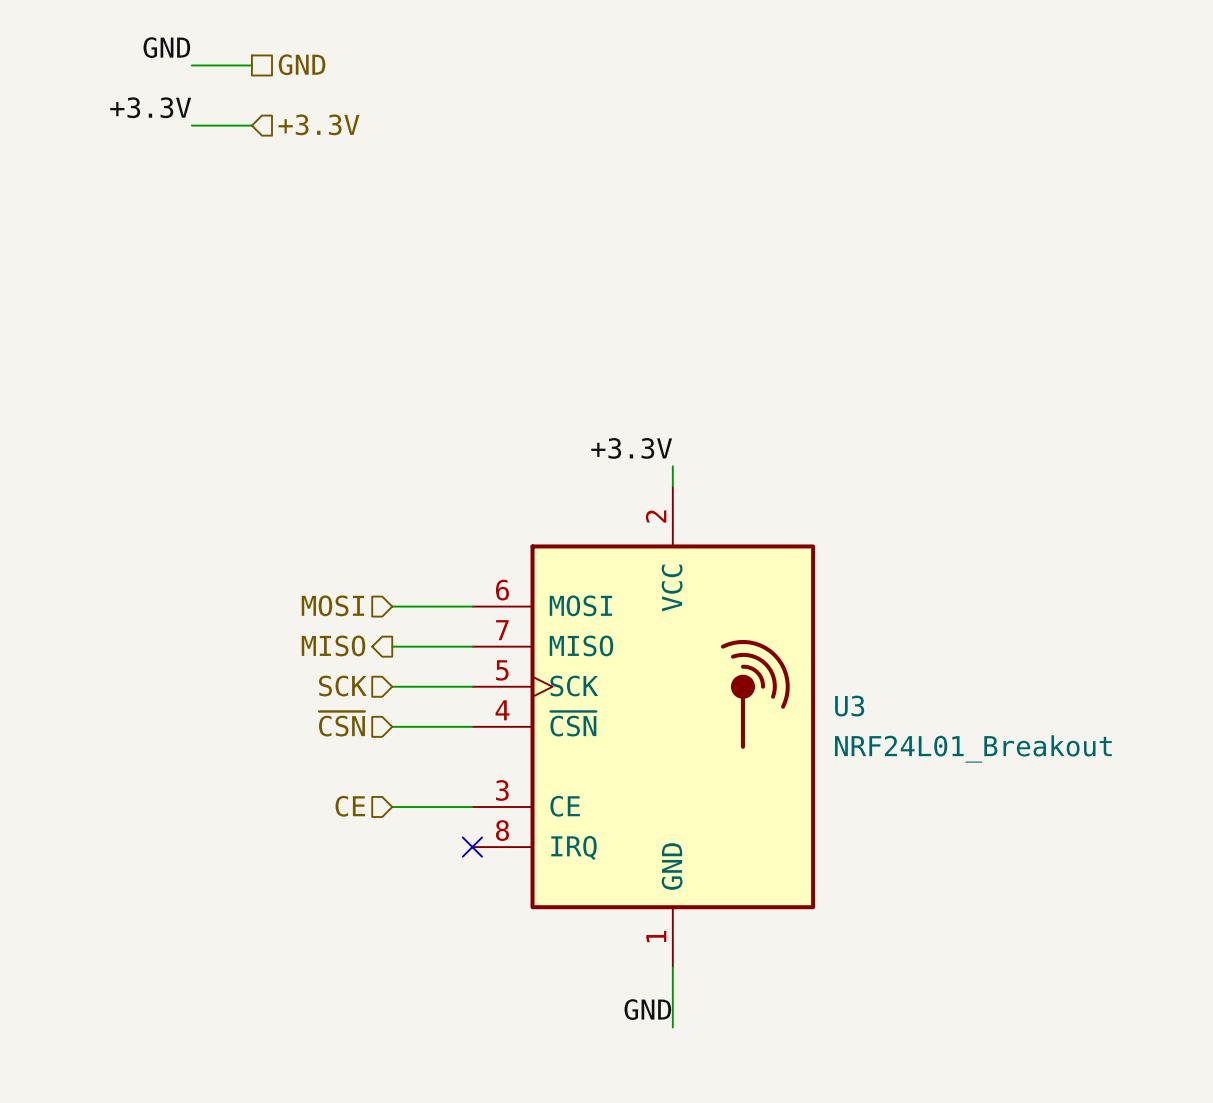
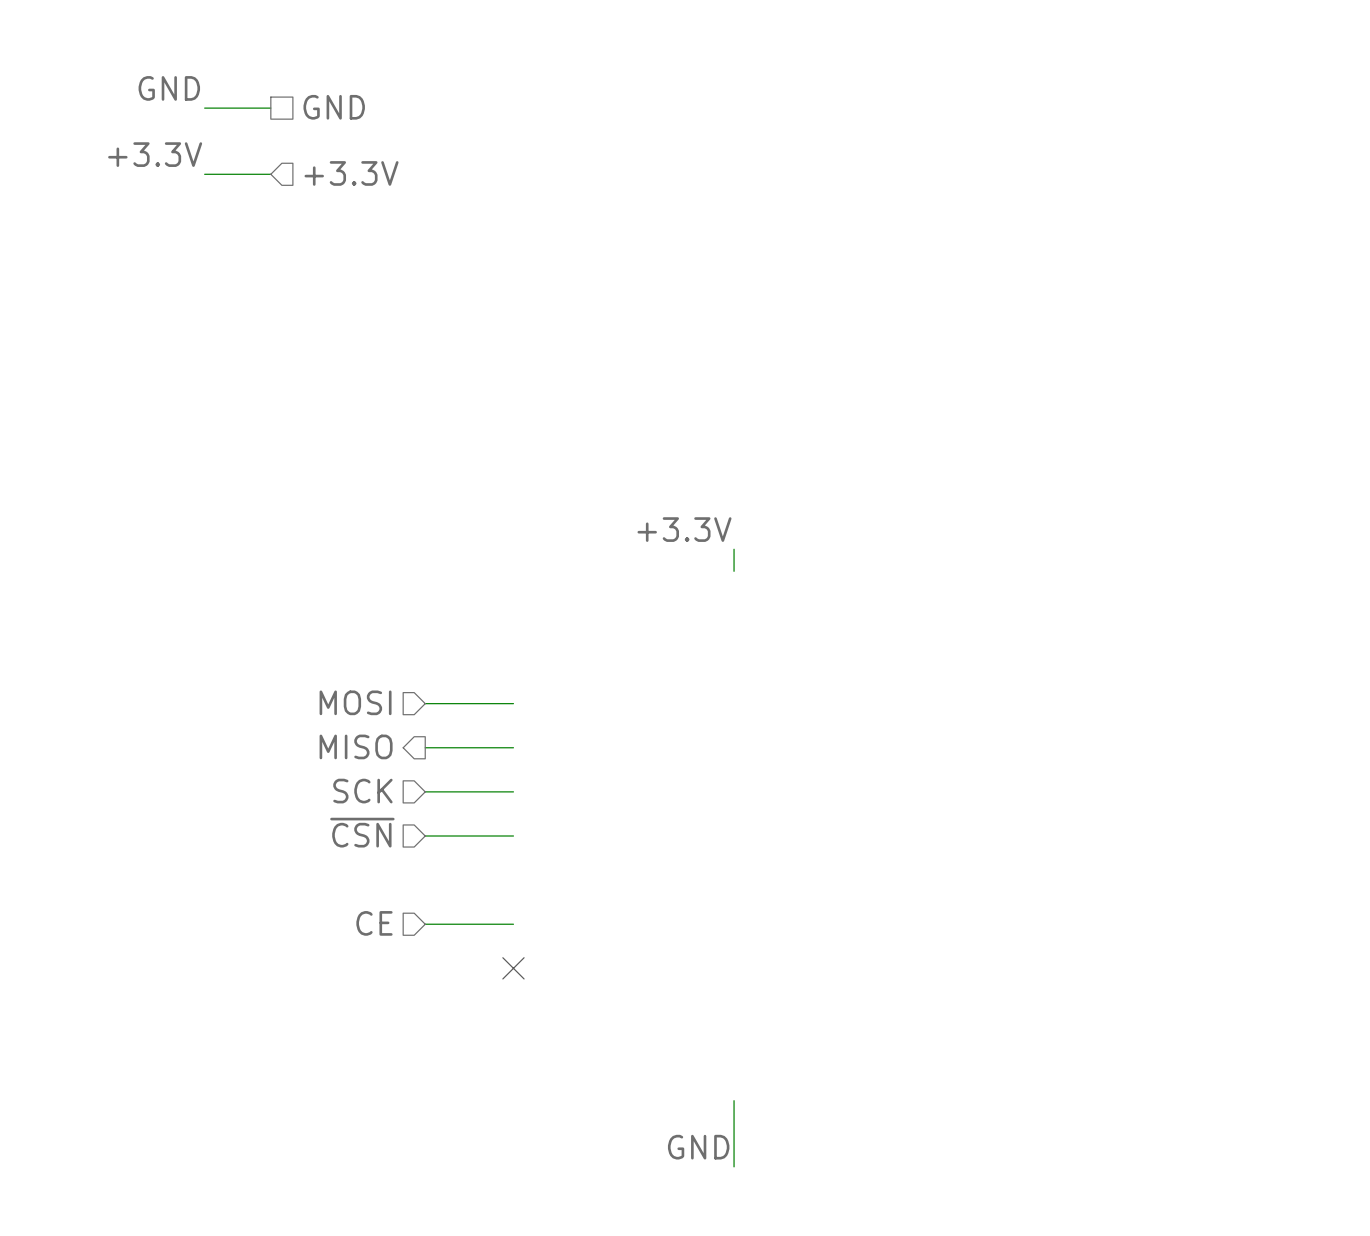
U3: NRF24L01_Breakout (643, 726) -> none

